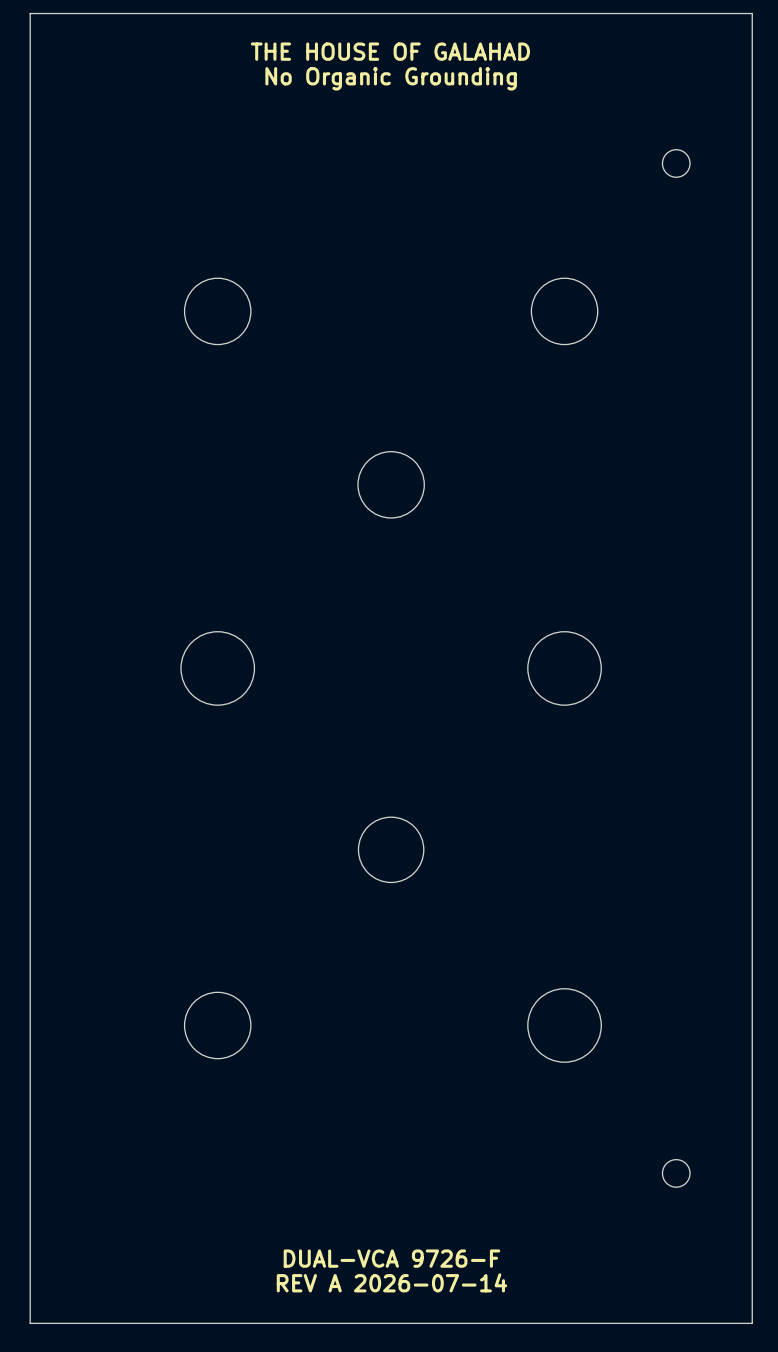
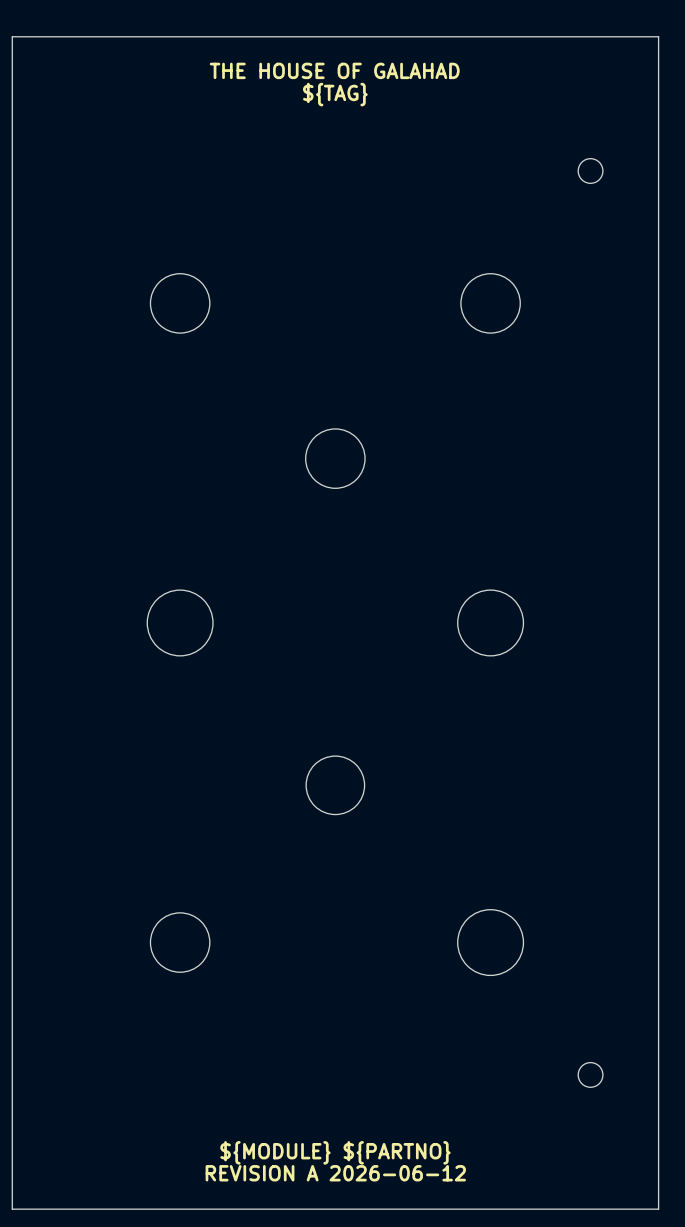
text: No Organic Grounding (391, 78) -> ${TAG} (335, 94)
text: DUAL-VCA 9726-F (391, 1258) -> ${MODULE} ${PARTNO} (335, 1152)
text: REV A 2026-07-14 (391, 1282) -> REVISION A 2026-06-12 (335, 1173)

